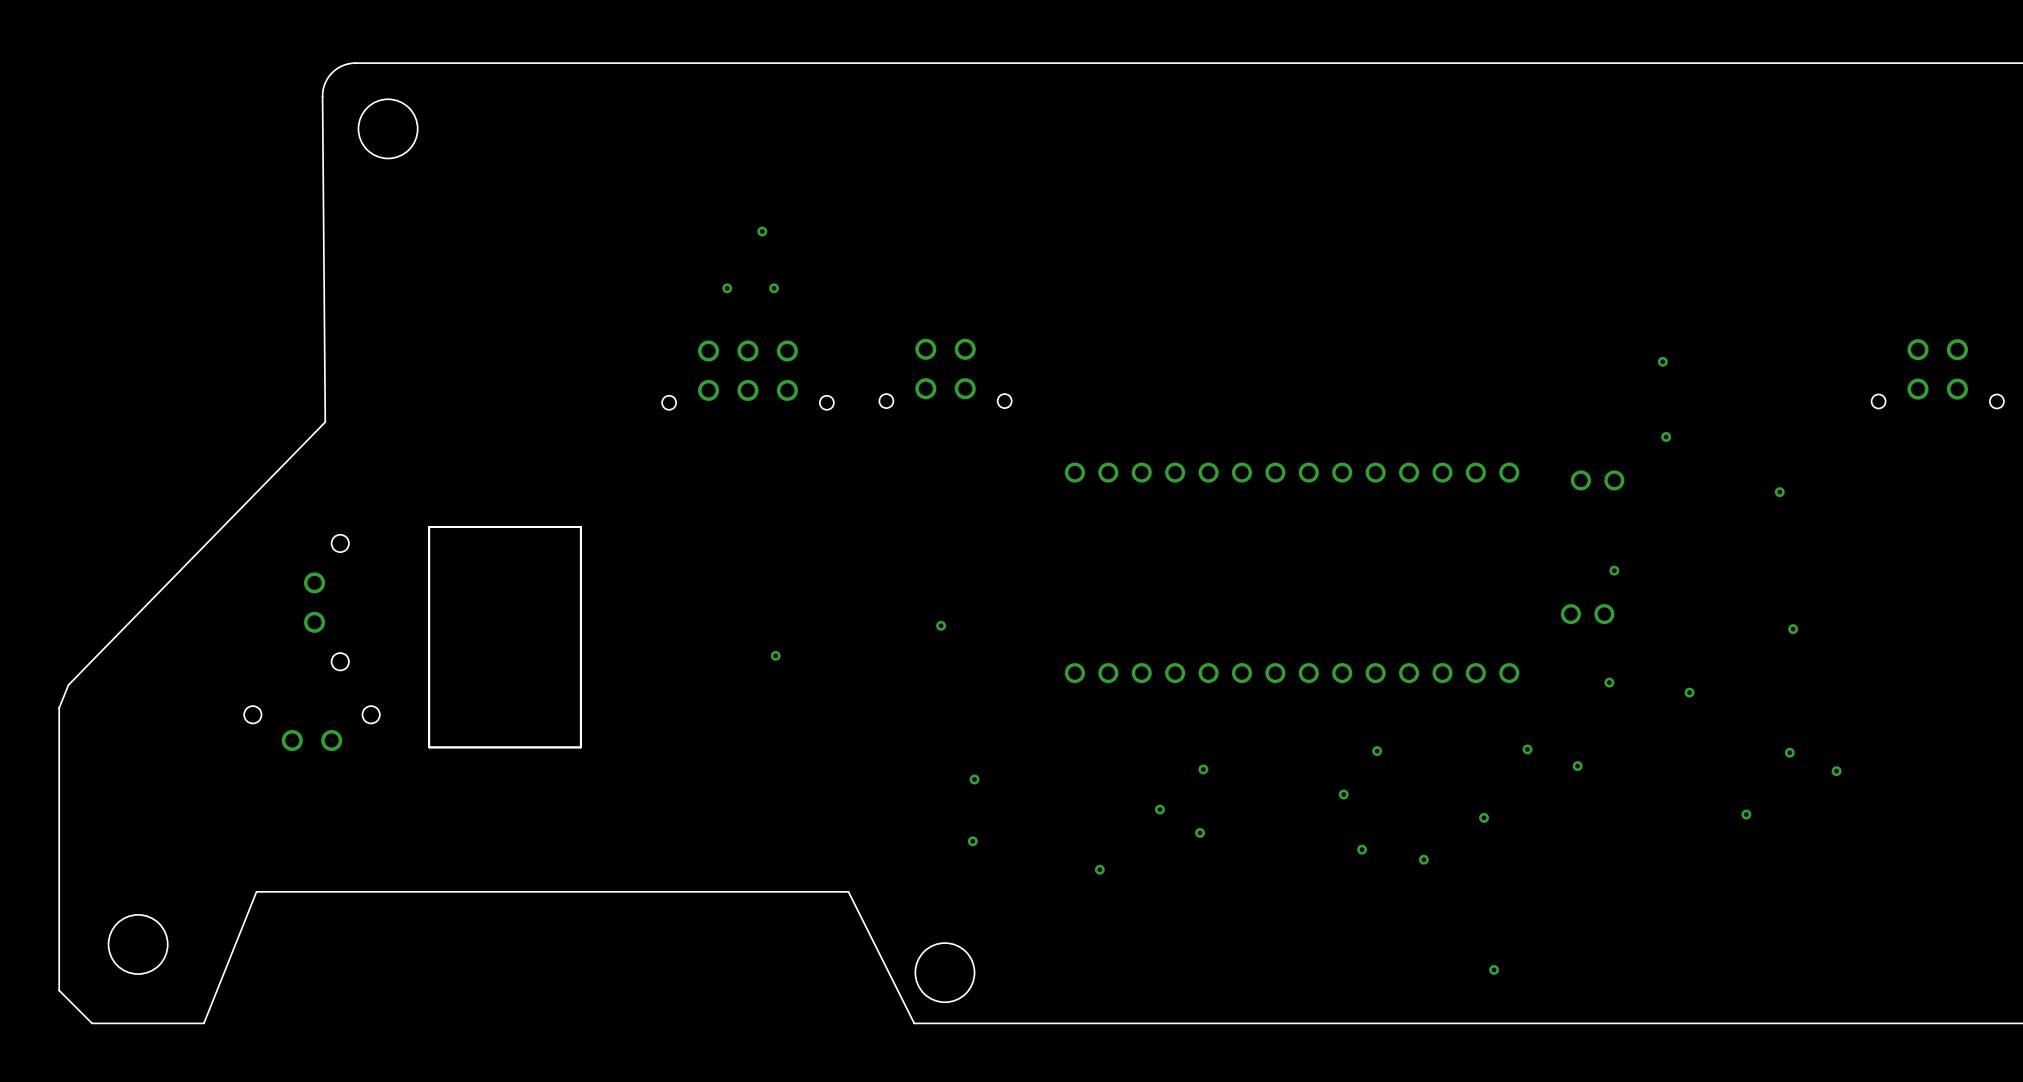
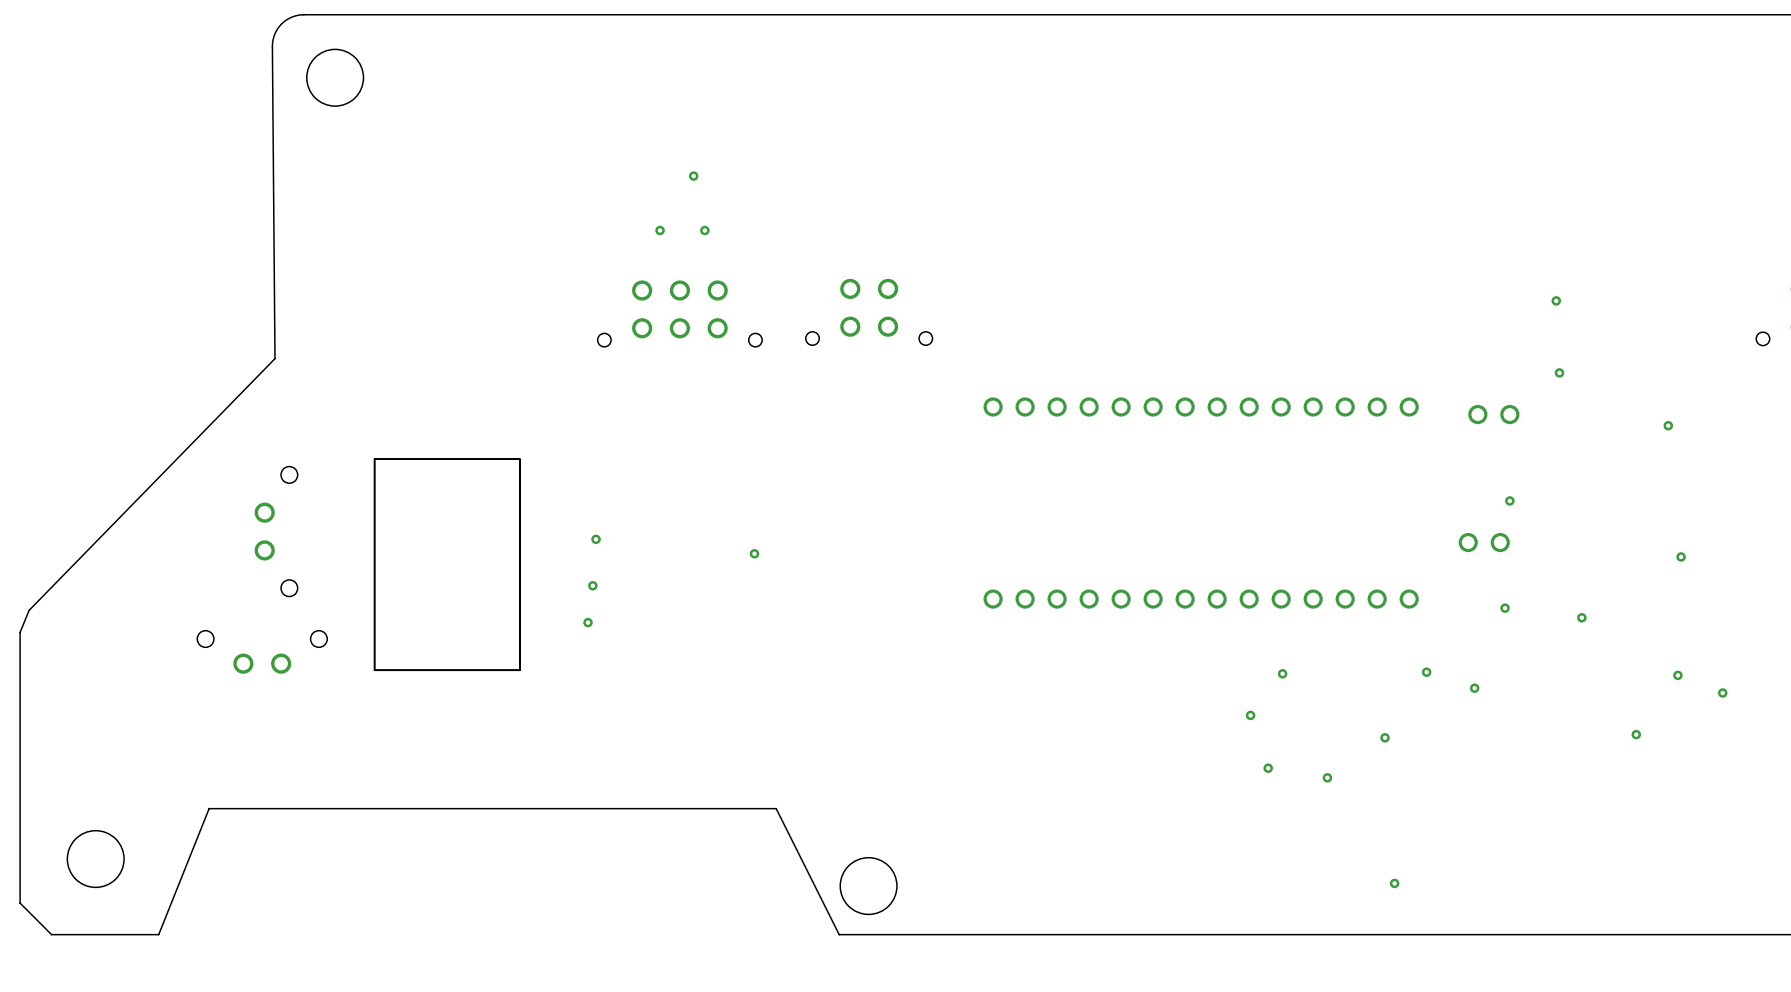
via: none -> (596, 539)
via: none -> (754, 553)
via: (941, 625) -> none
via: (775, 655) -> none
via: none -> (592, 585)
via: none -> (588, 622)
via: (1203, 769) -> none
via: (974, 779) -> none
via: (1159, 809) -> none
via: (1200, 832) -> none
via: (972, 841) -> none
via: (1099, 869) -> none

